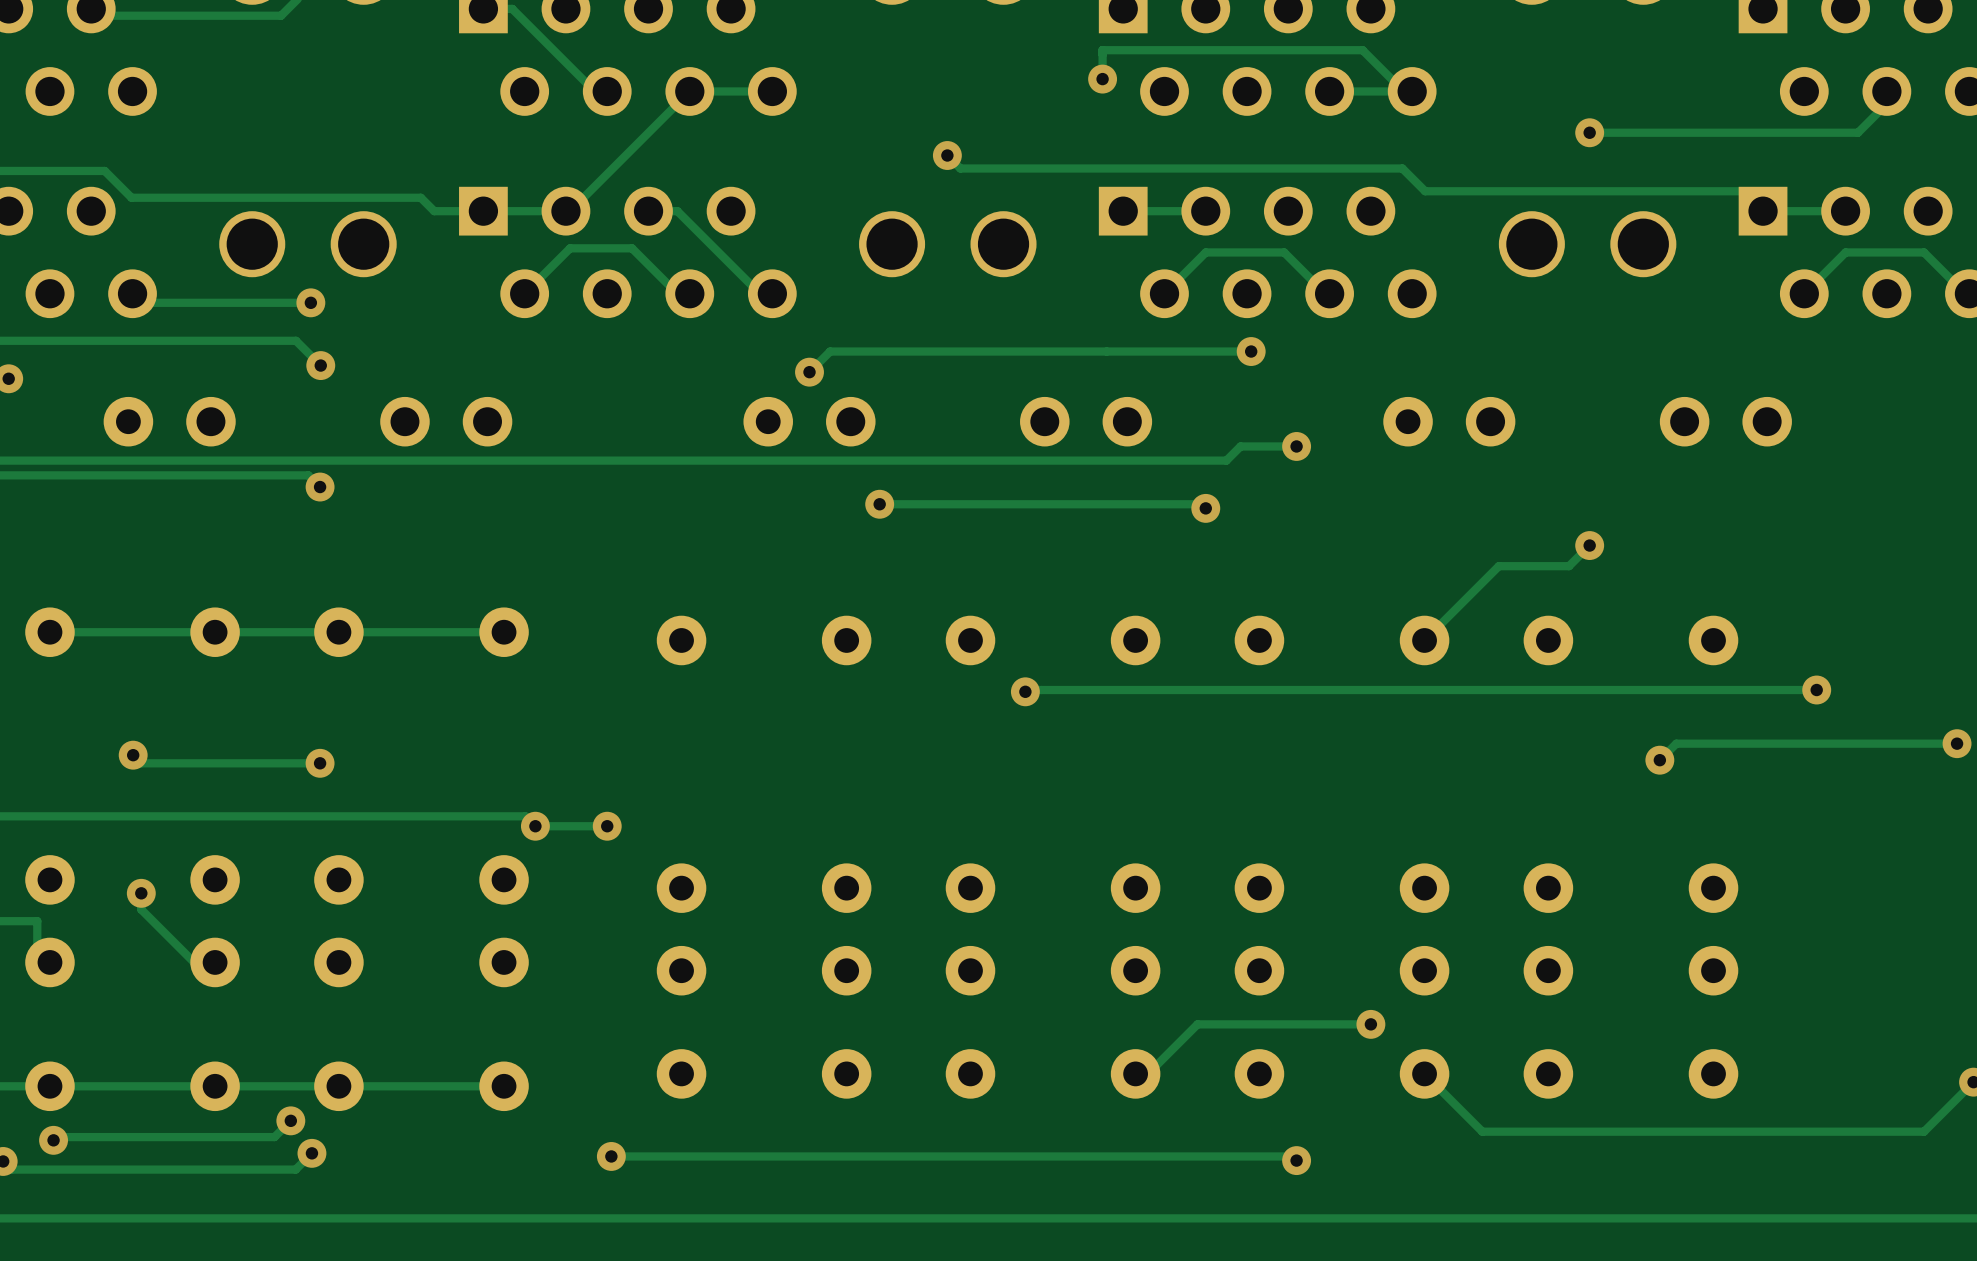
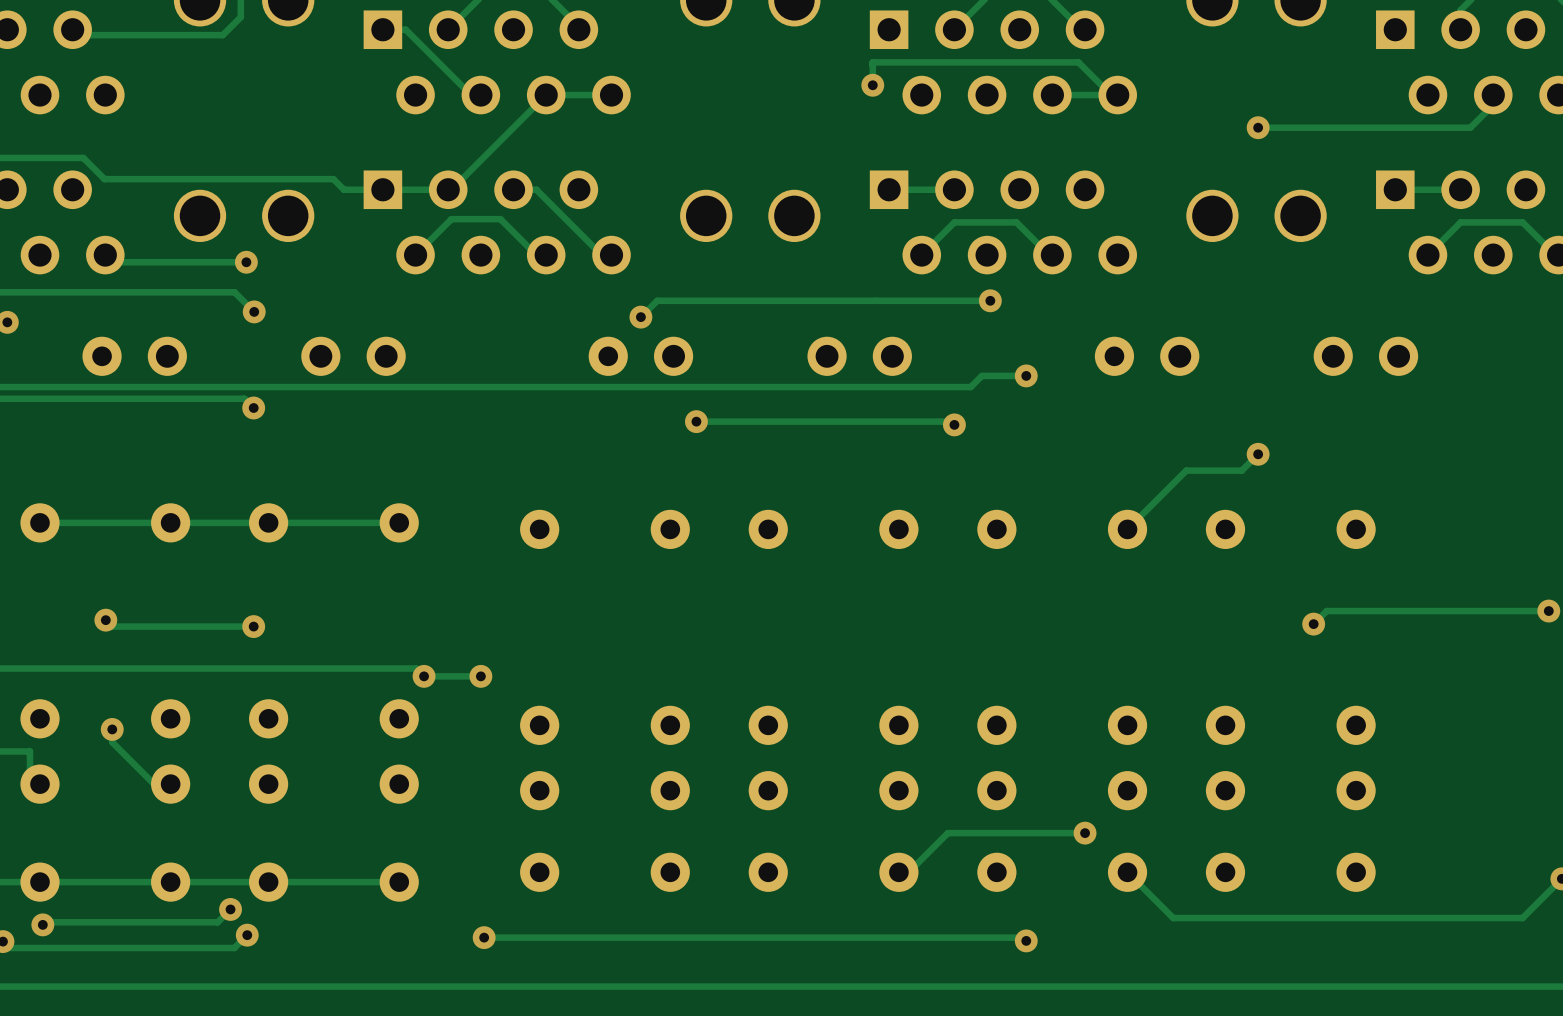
track: (947, 155) (960, 168) (1402, 168) (1425, 191) (1743, 191) -> none
via: (947, 155) -> none
track: (1816, 690) (1027, 690) (1025, 691) -> none
via: (1816, 690) -> none
via: (1025, 691) -> none

